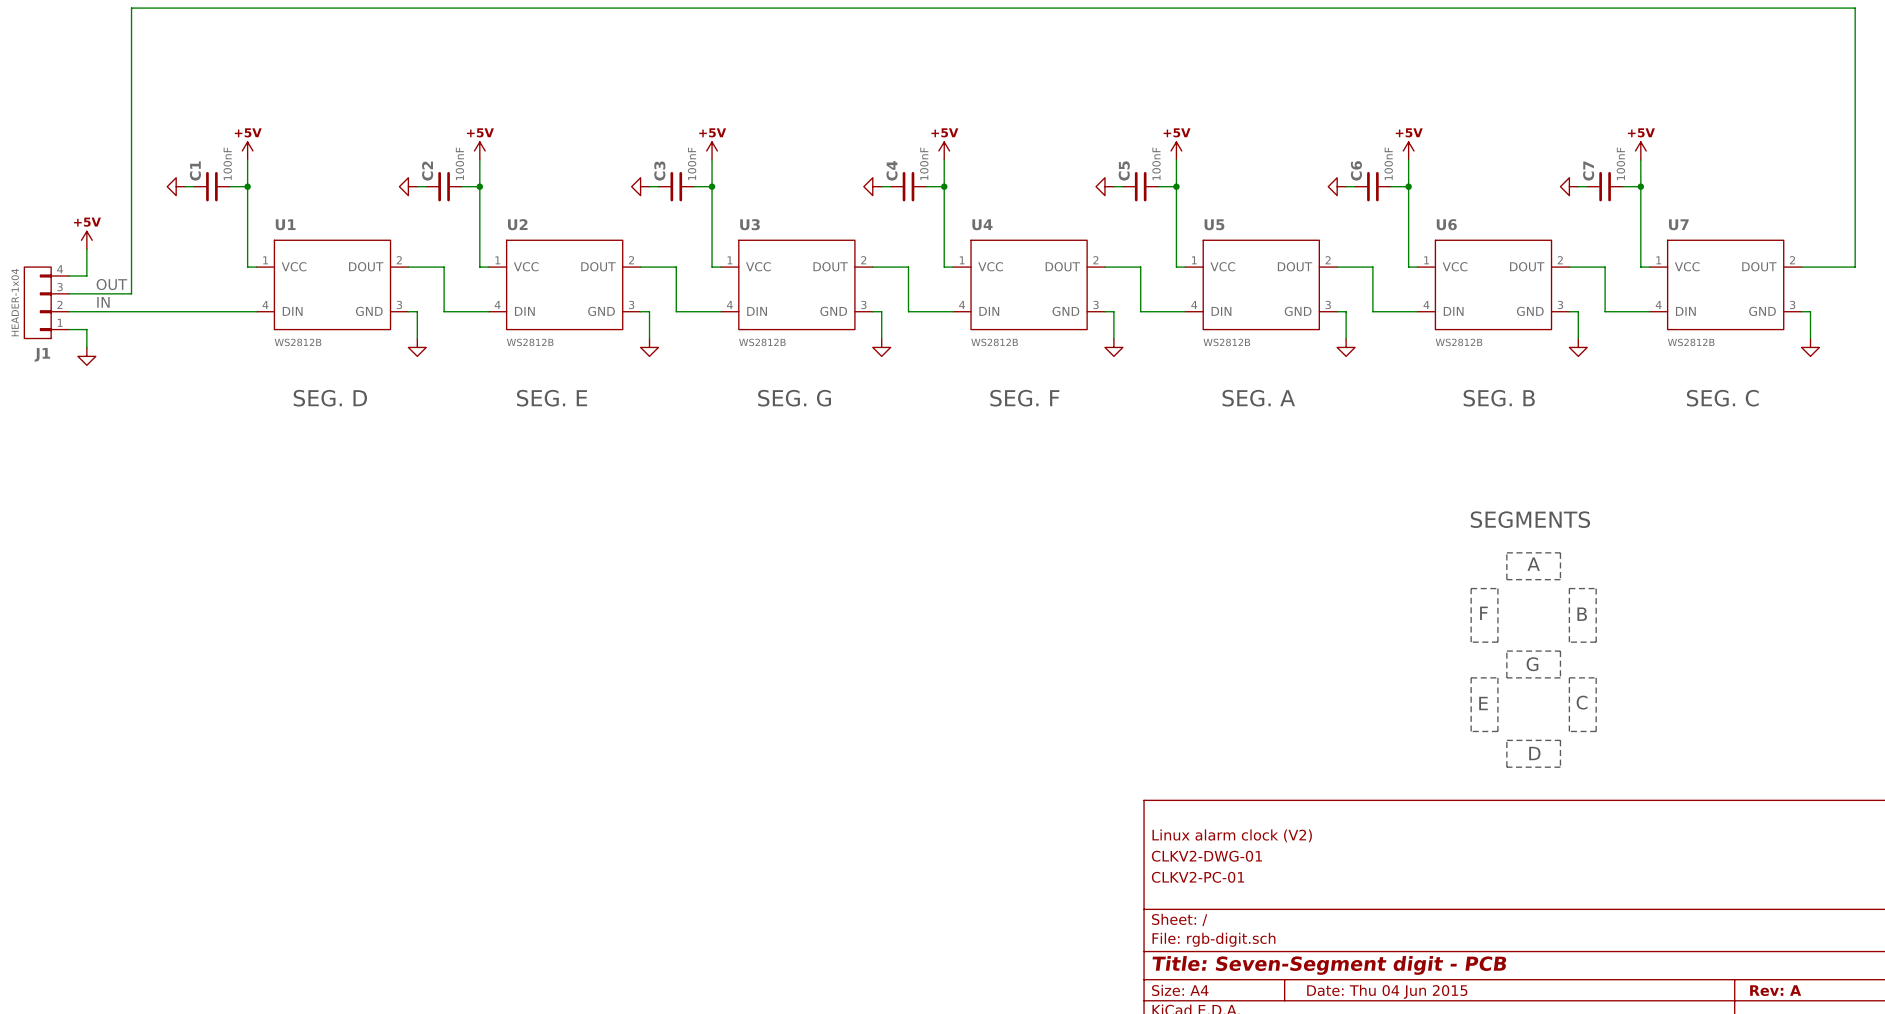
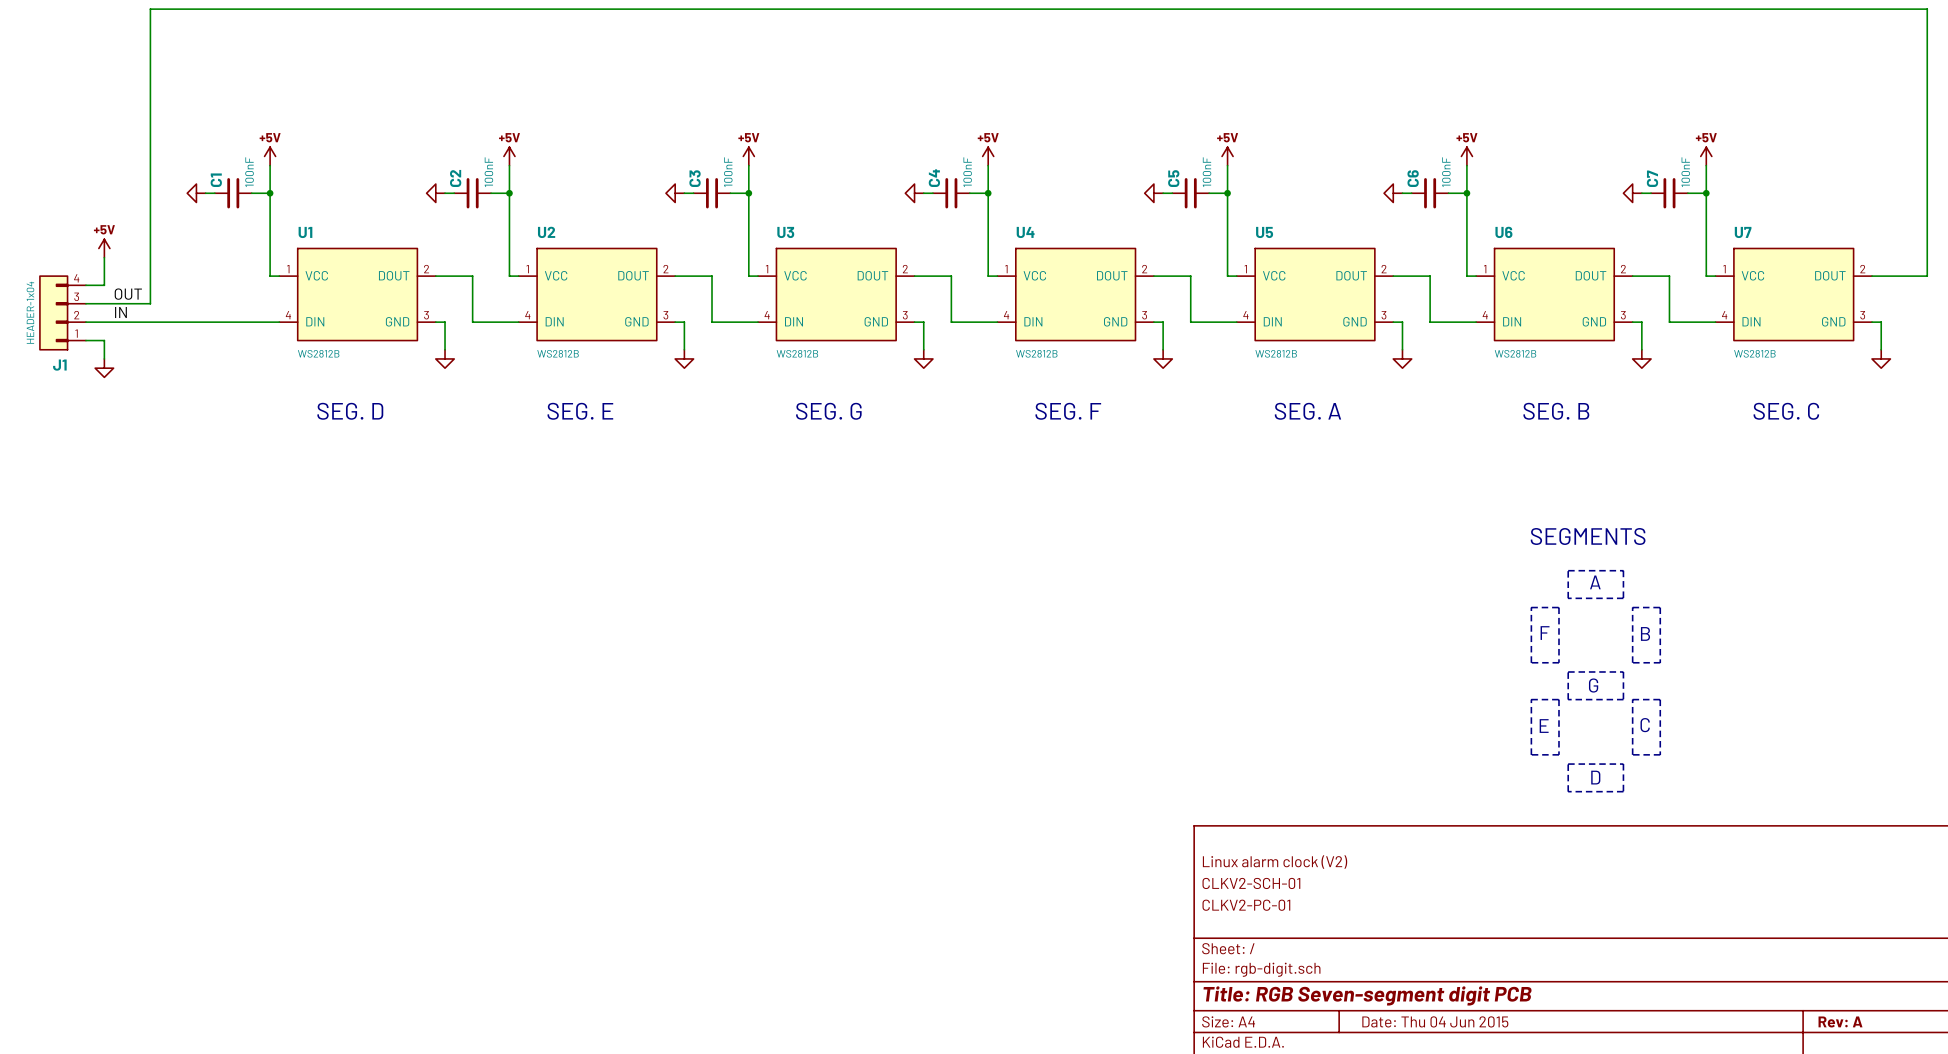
title block: CLKV2-DWG-01 (1206, 856) -> CLKV2-SCH-01 (1251, 883)
title block: Title: Seven-Segment digit - PCB (1329, 965) -> Title: RGB Seven-segment digit PCB (1367, 995)

